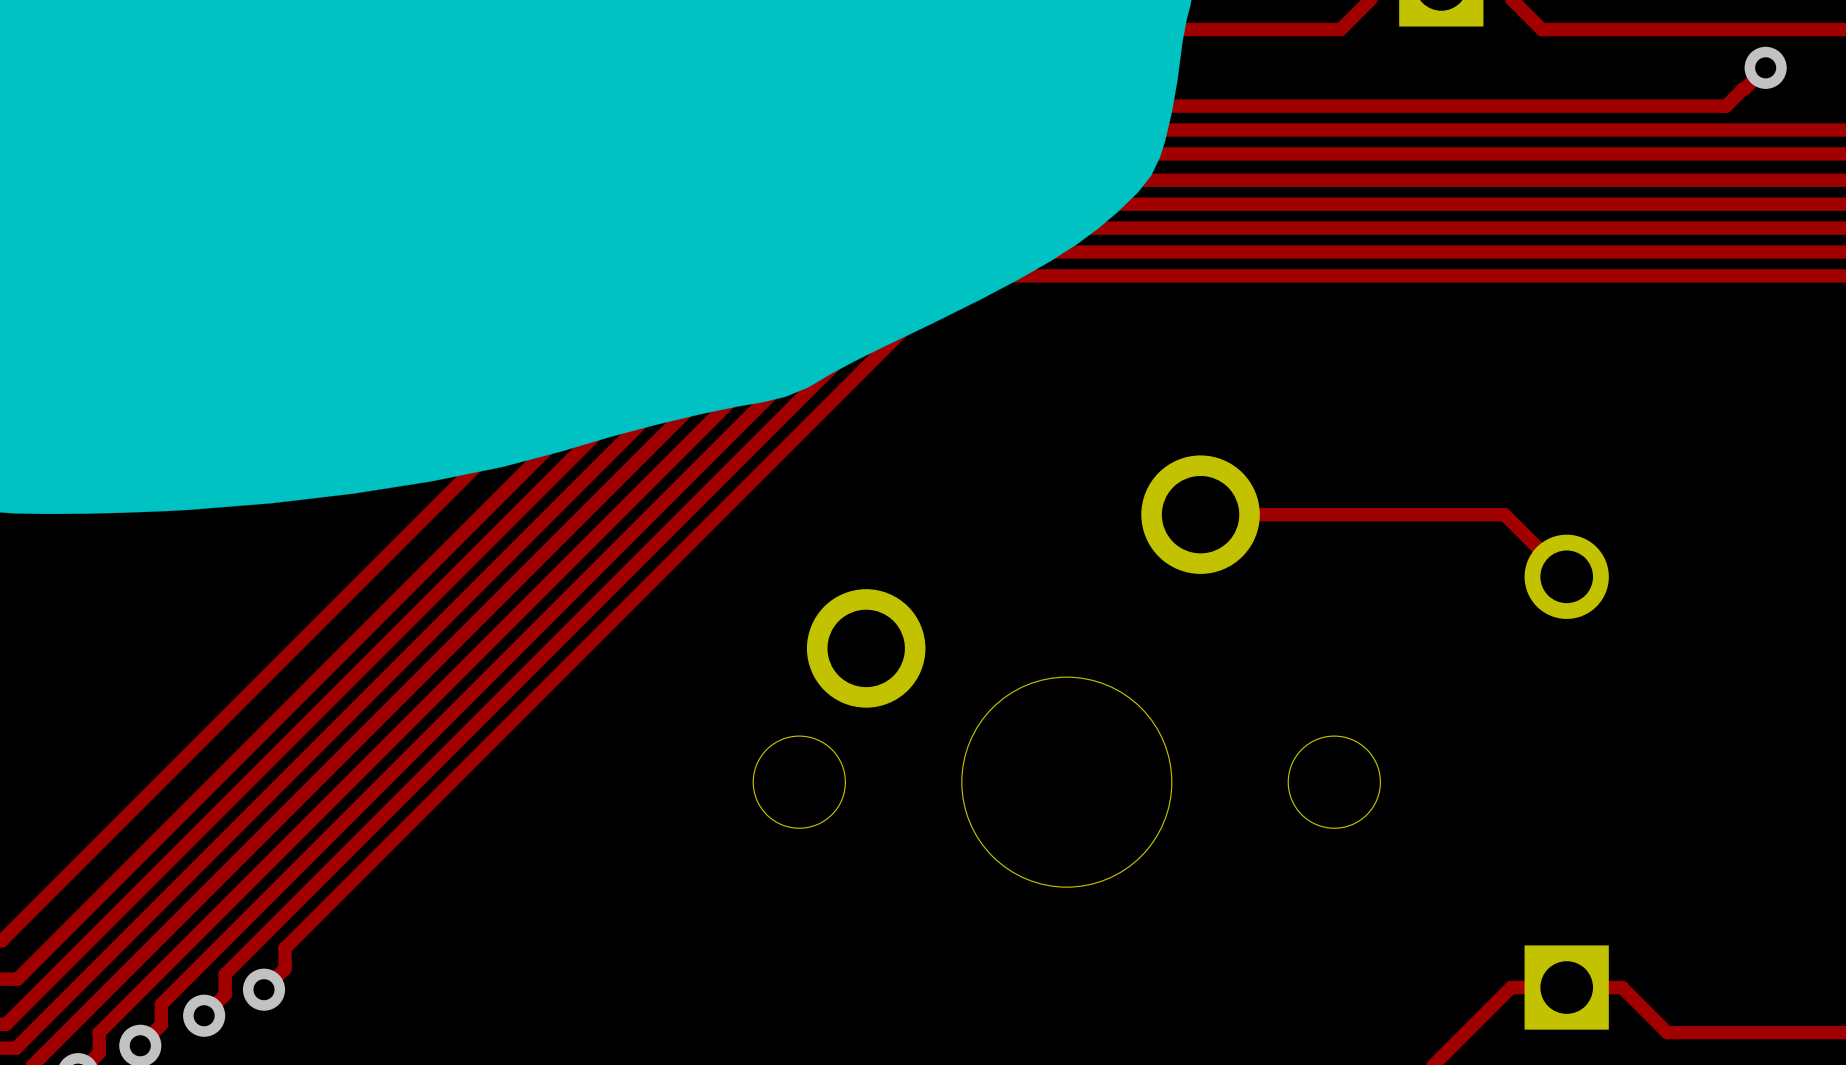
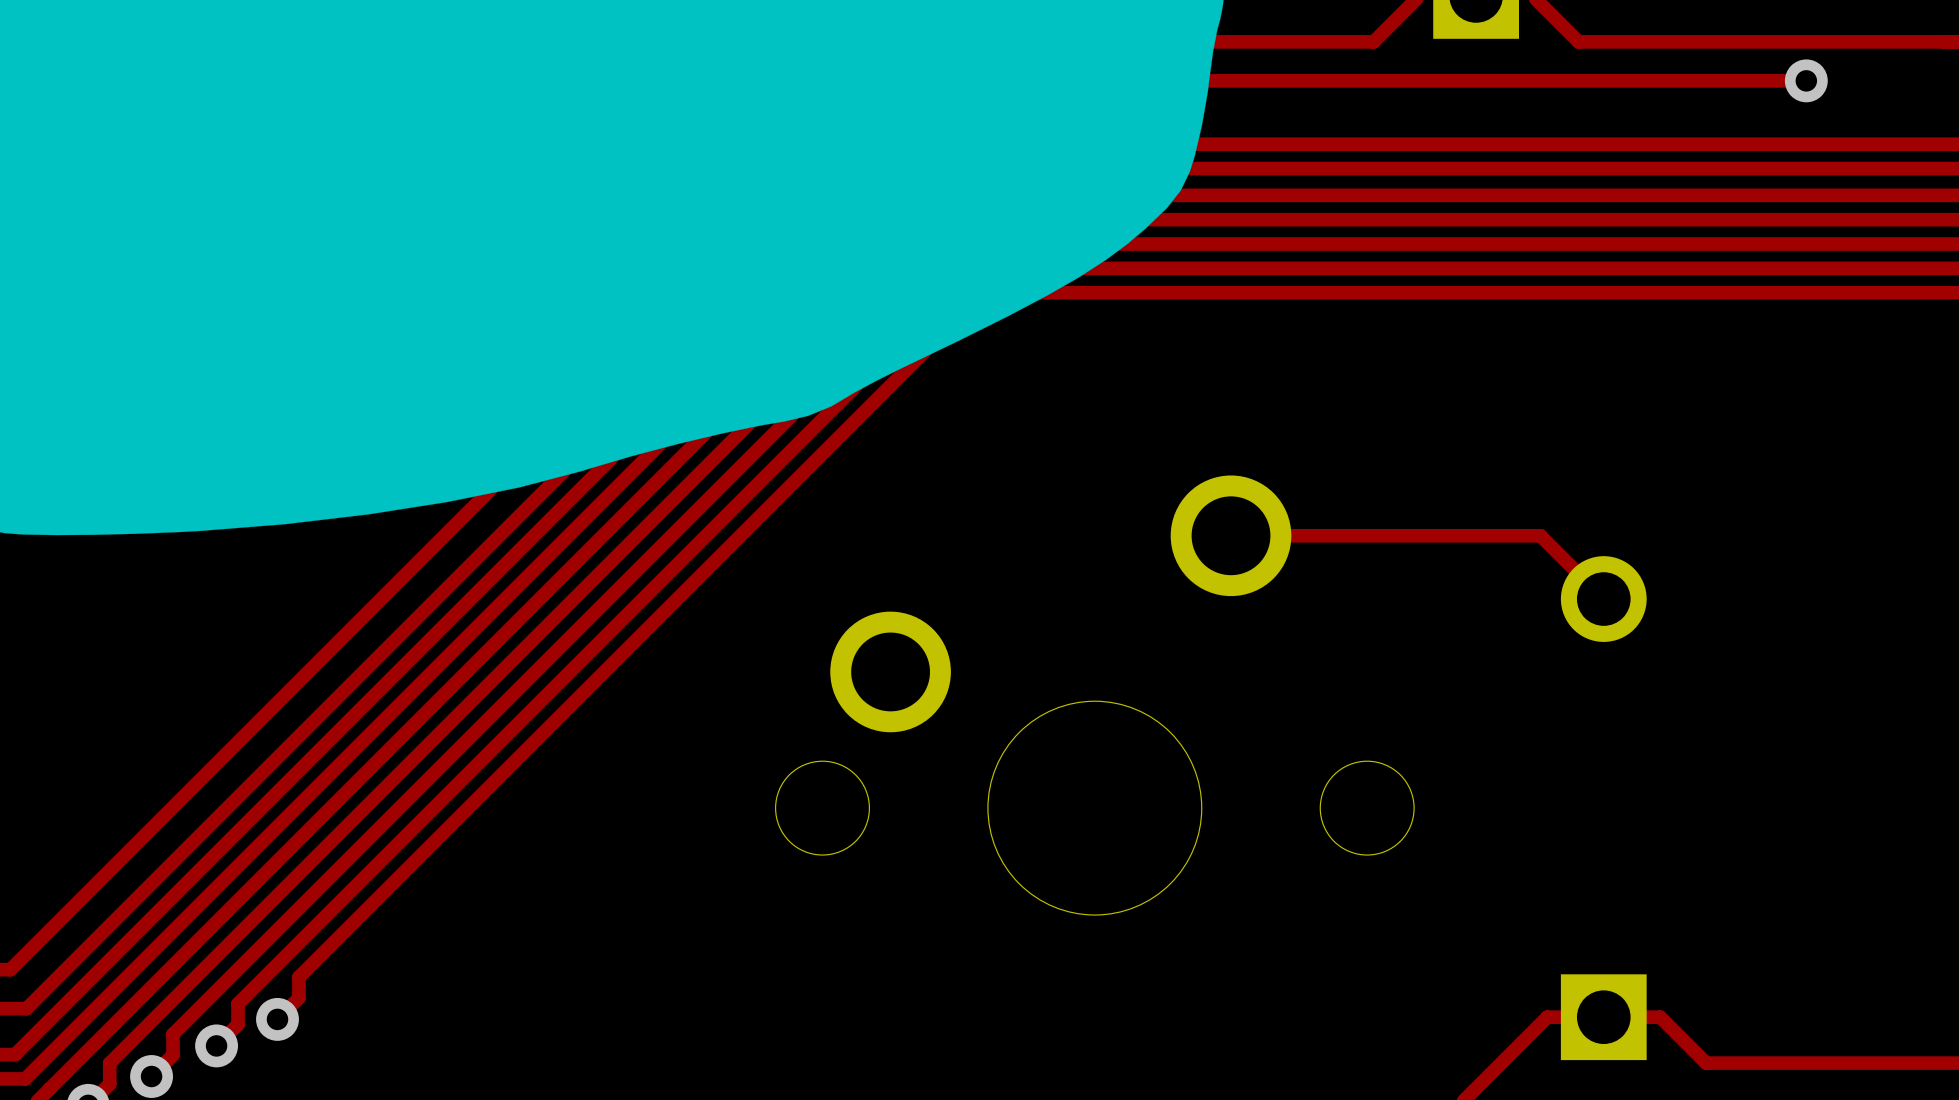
track: (1765, 67) (1726, 106) (890, 106) (17, 979) -> (1806, 80) (954, 80) (26, 1008)

